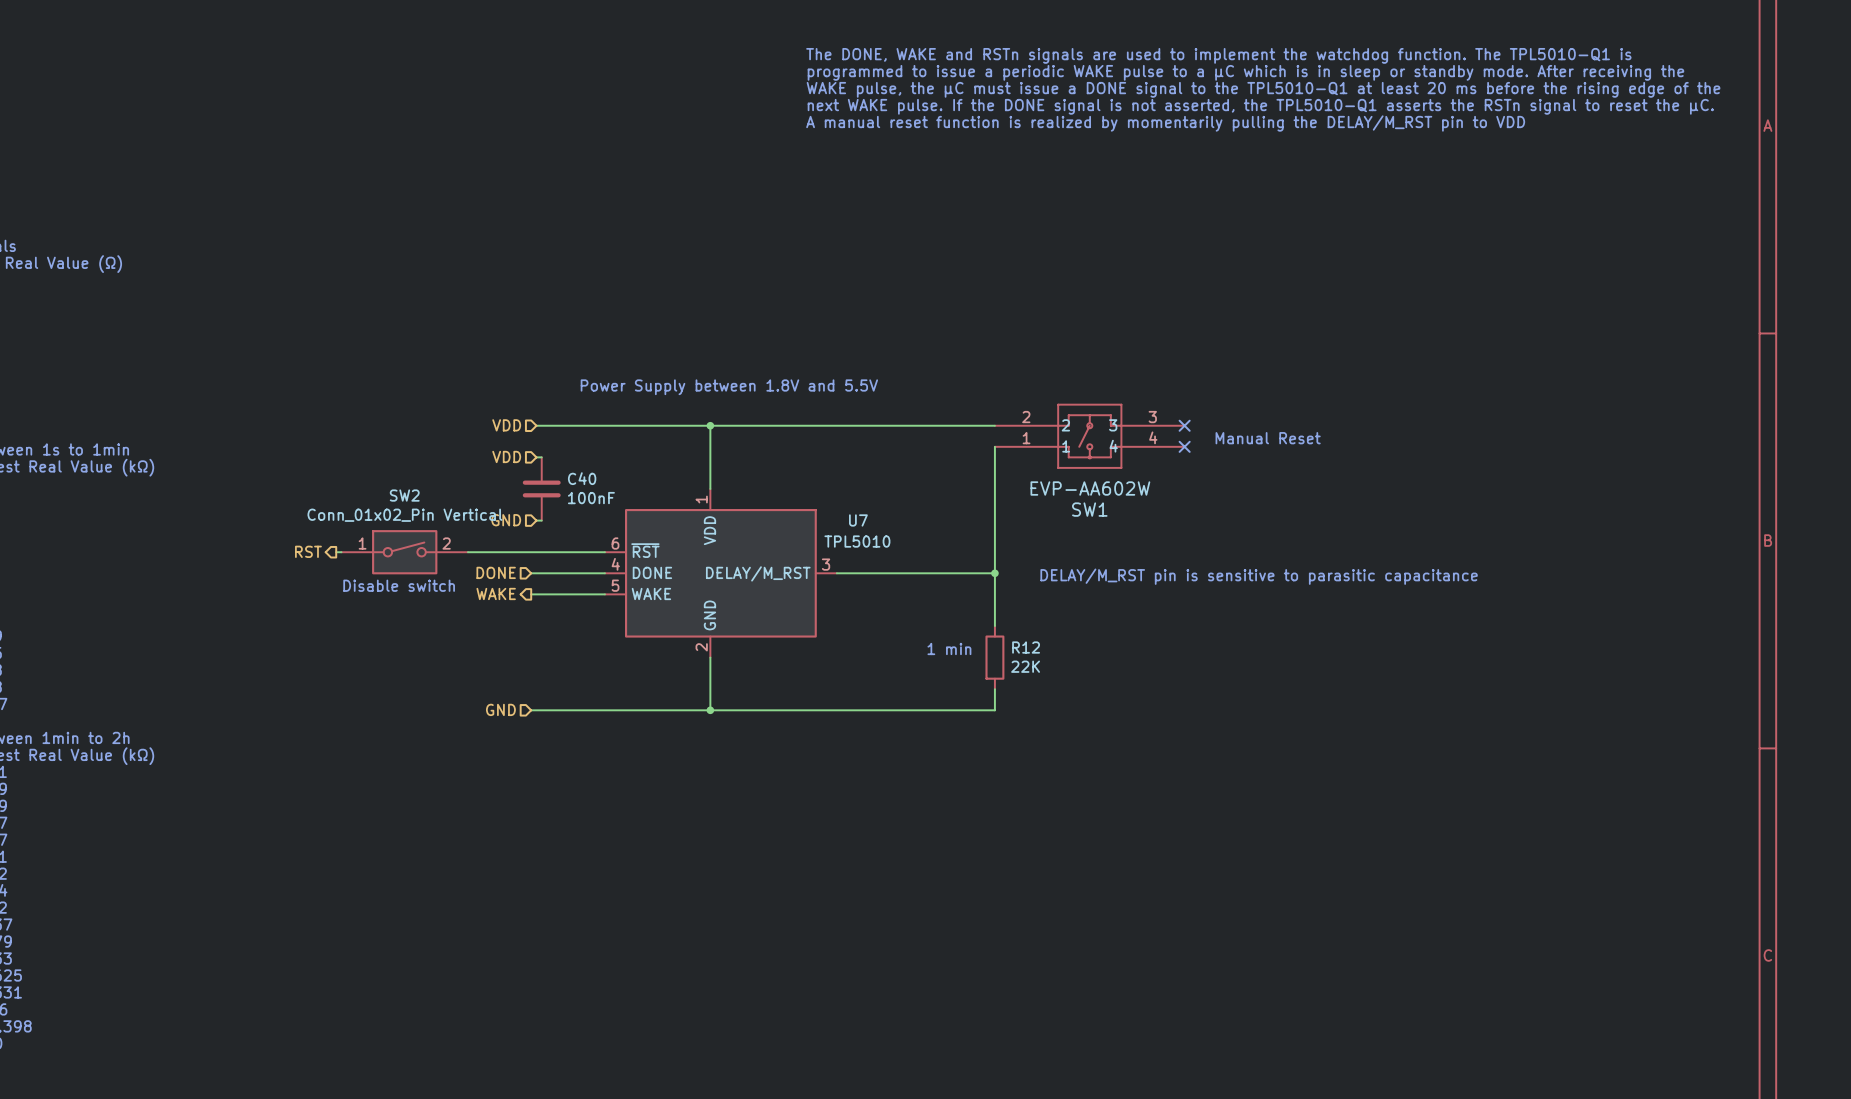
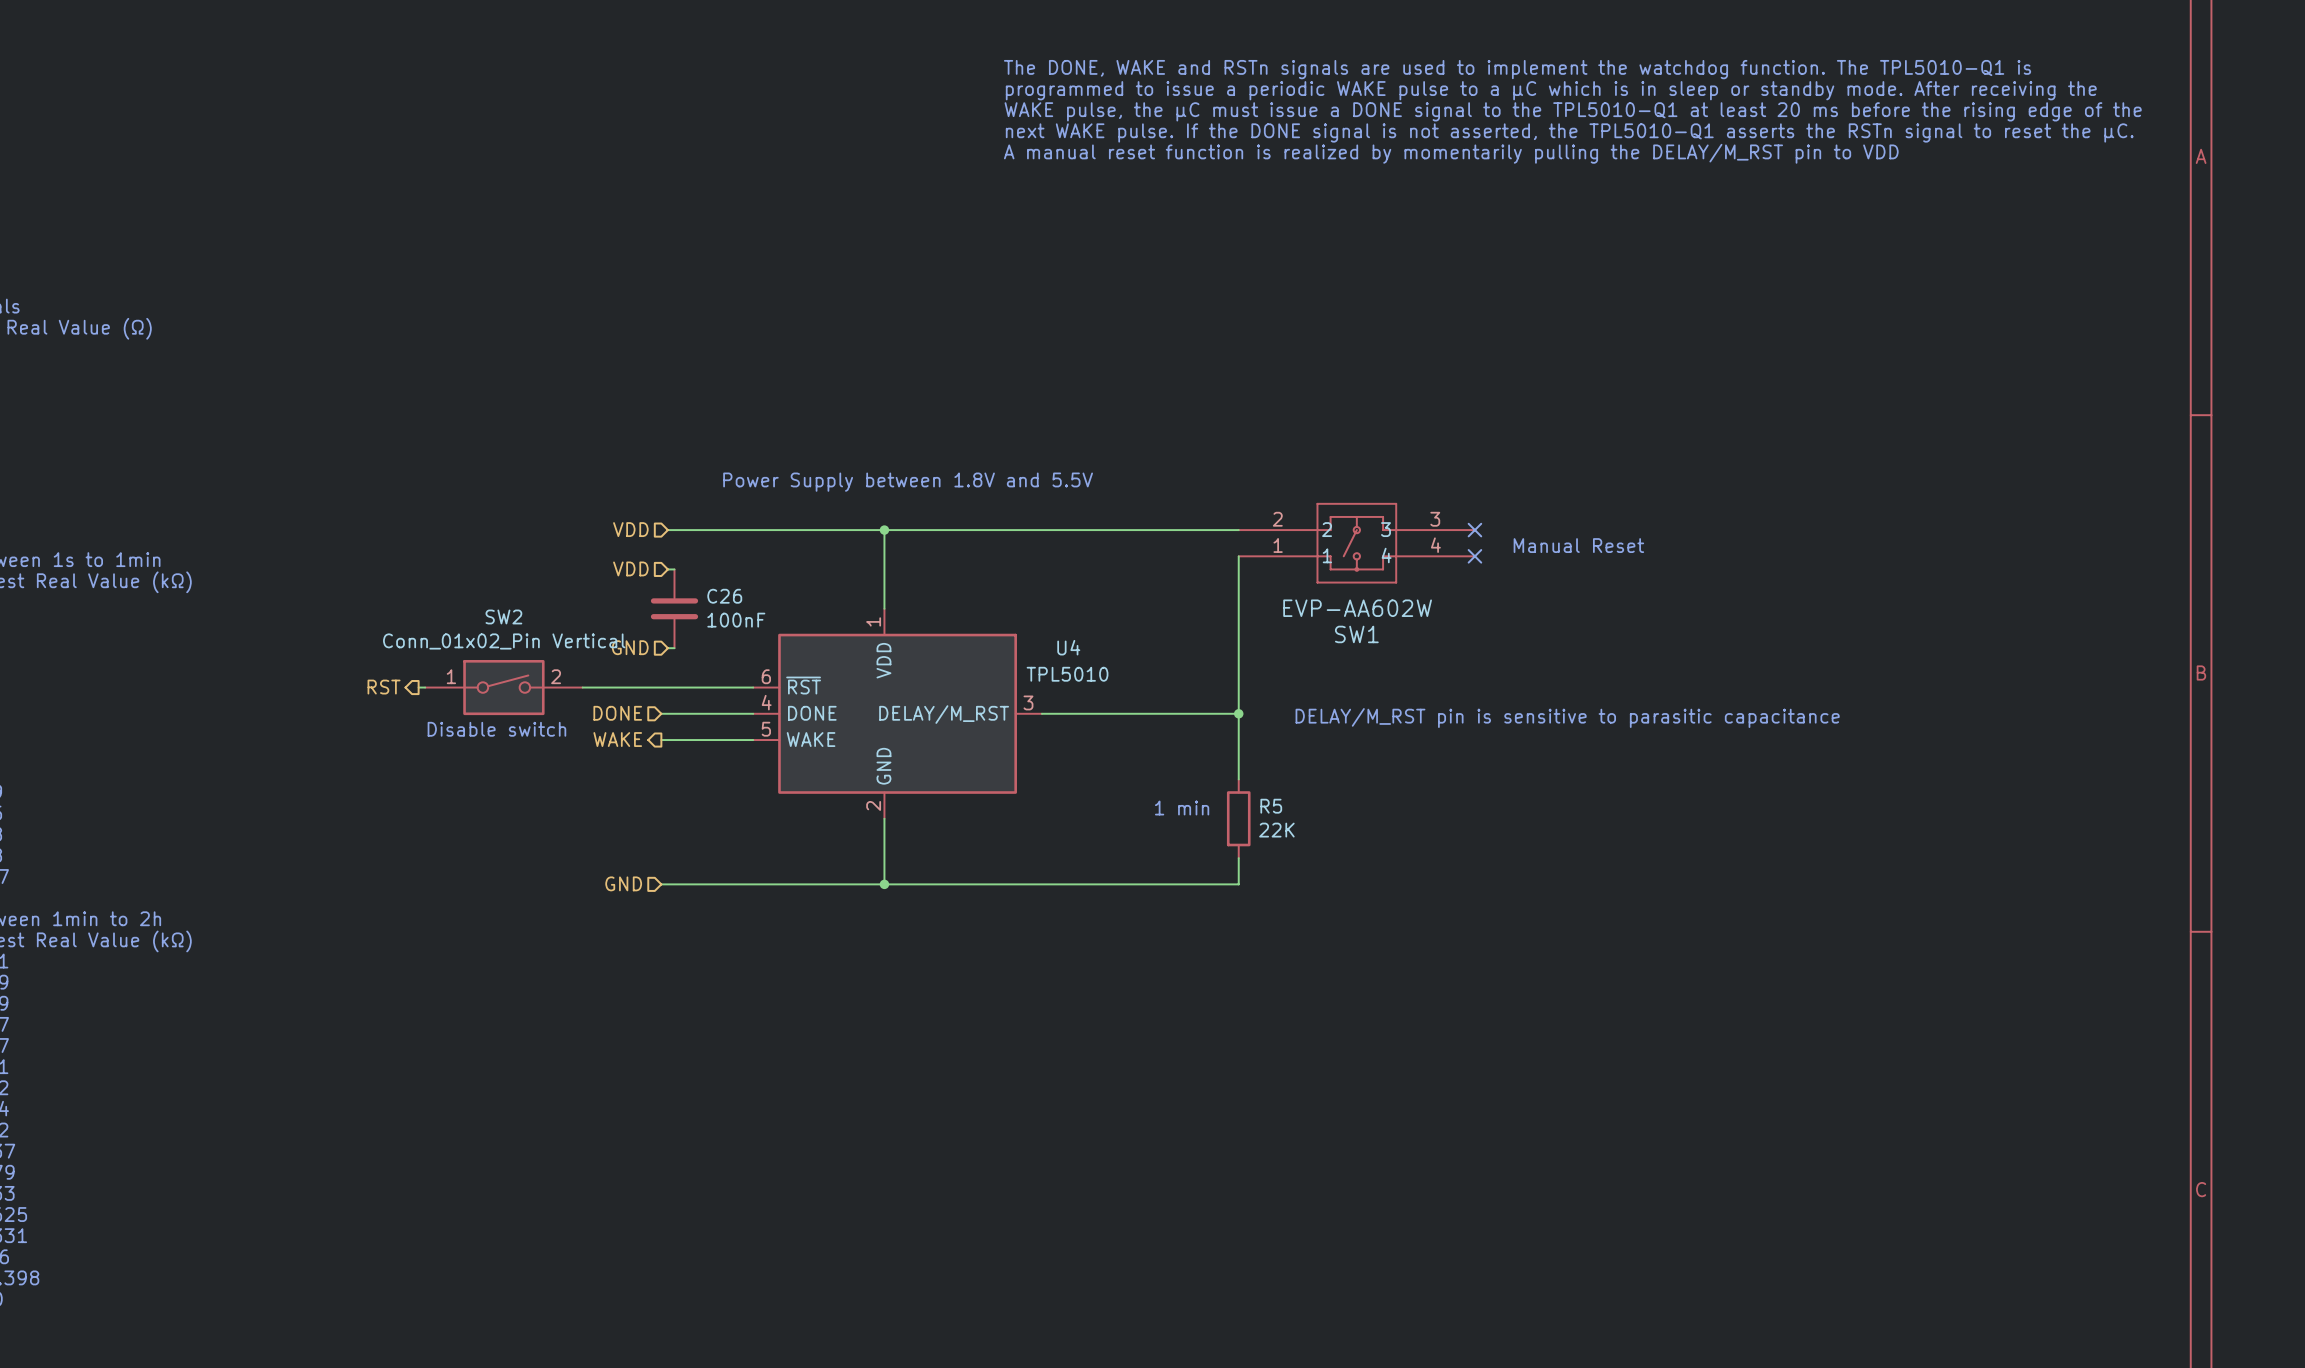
C40 name: C40 (582, 478) -> C26 (724, 596)
U7 name: U7 (858, 520) -> U4 (1068, 647)
R12 name: R12 (1026, 647) -> R5 (1271, 806)

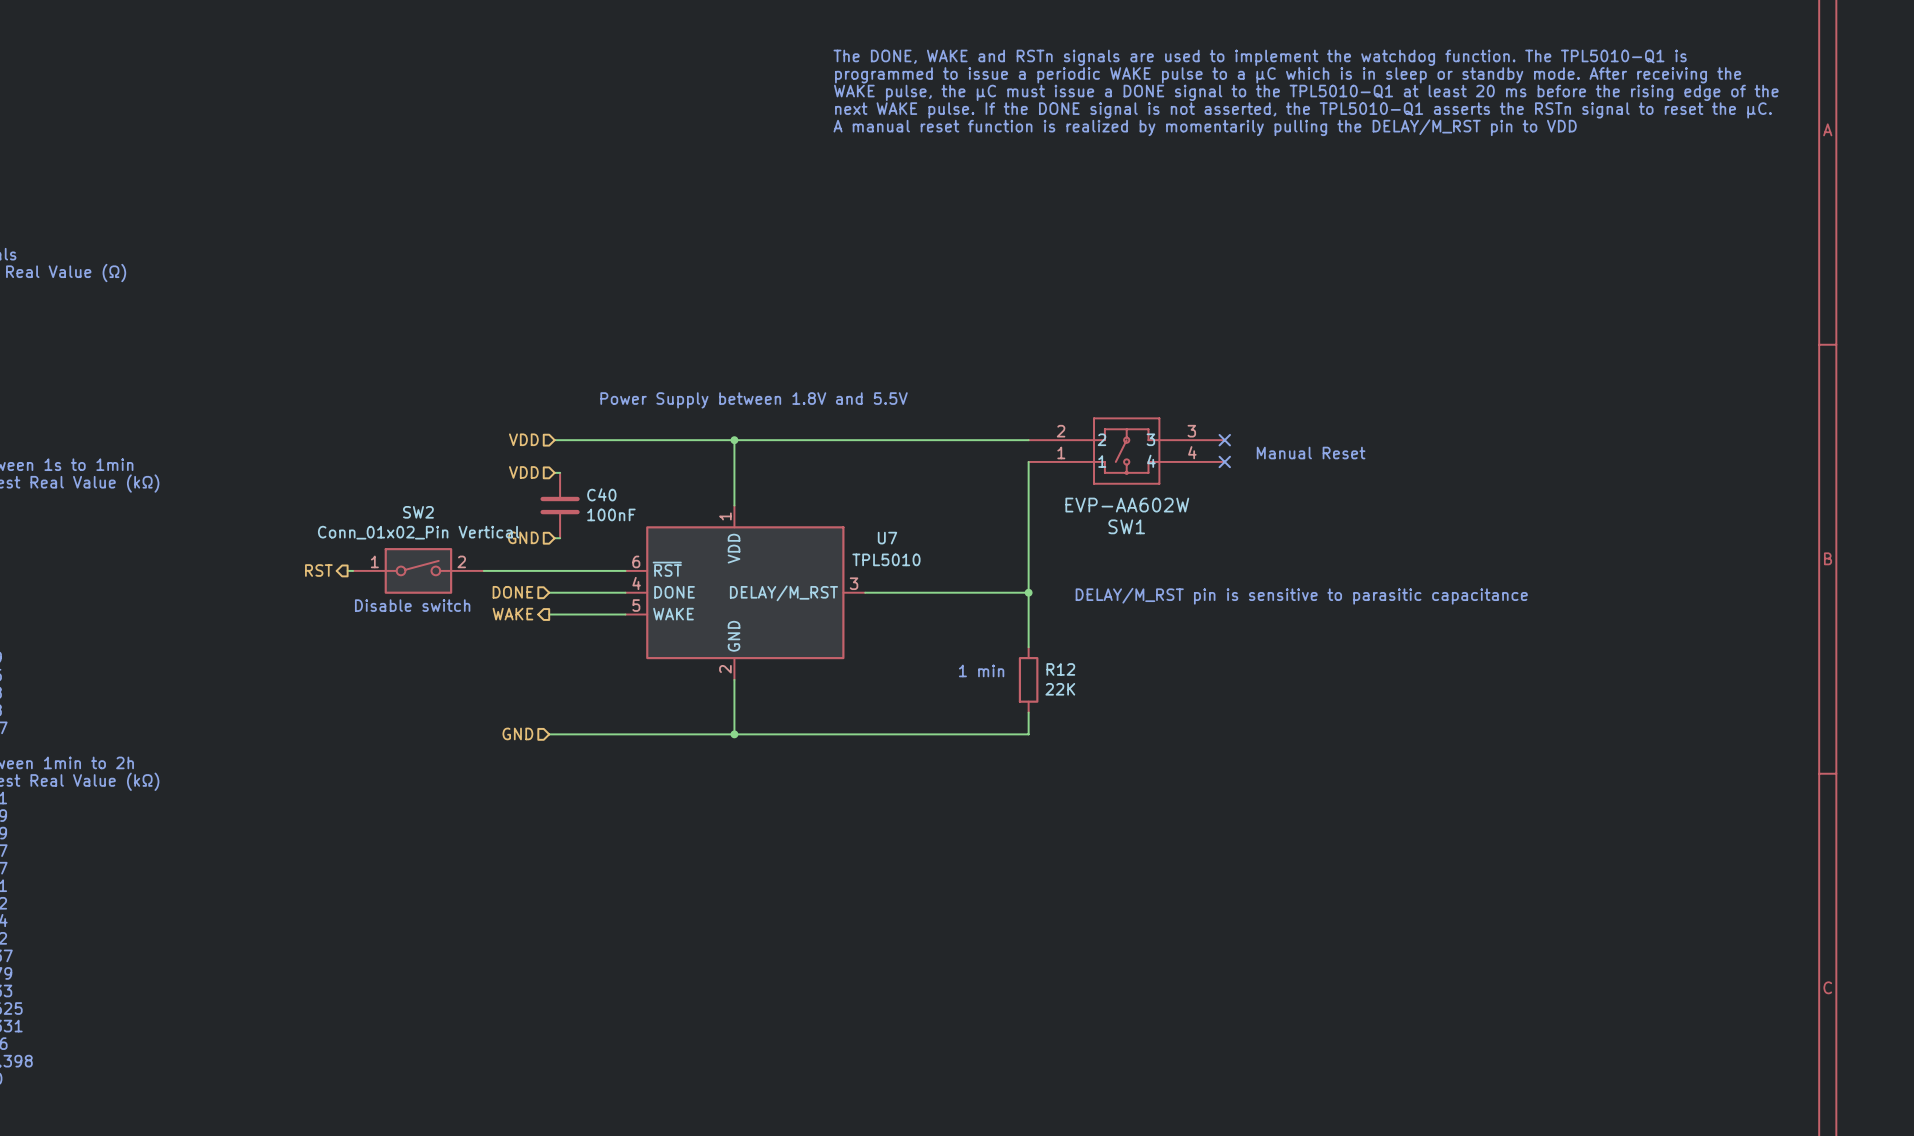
C26 name: C26 (724, 596) -> C40 (601, 494)
U4 name: U4 (1068, 647) -> U7 (887, 538)
R5 name: R5 (1271, 806) -> R12 (1060, 669)

